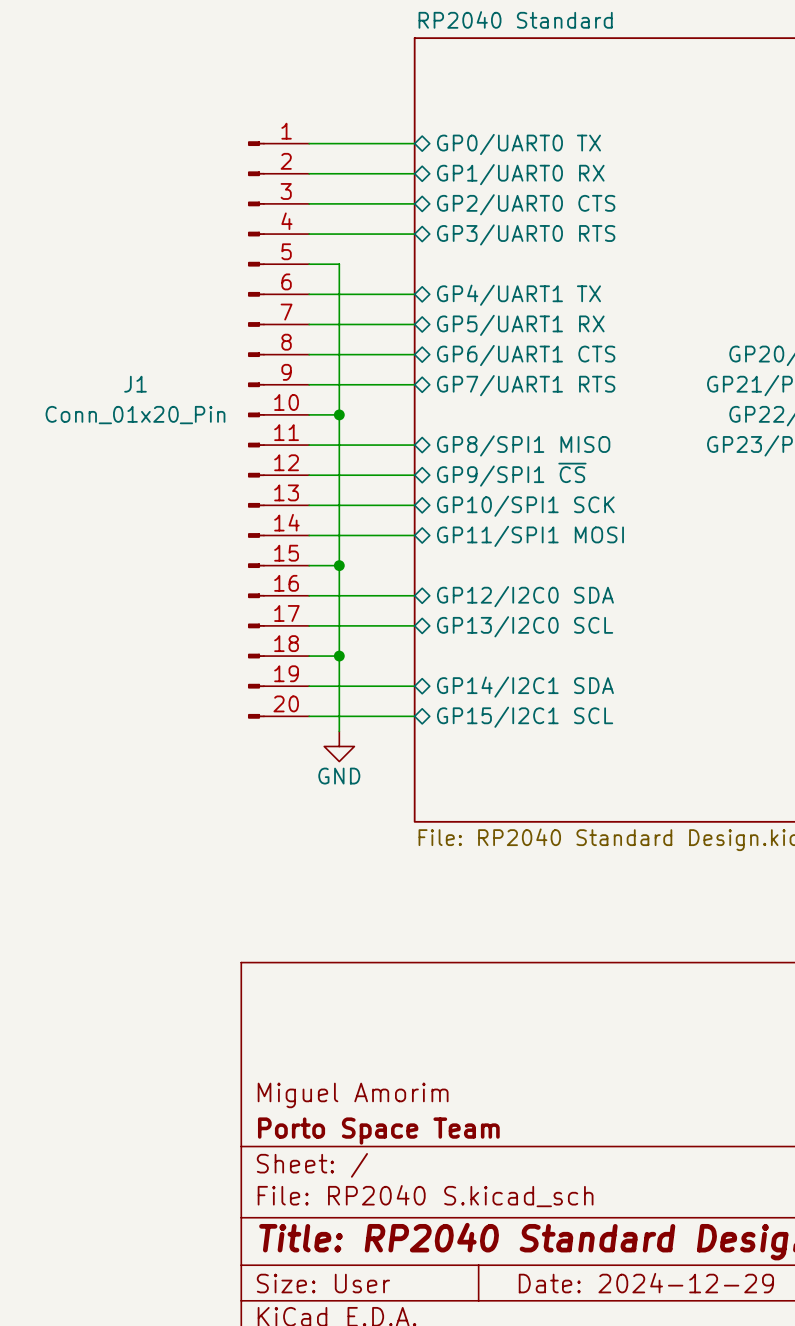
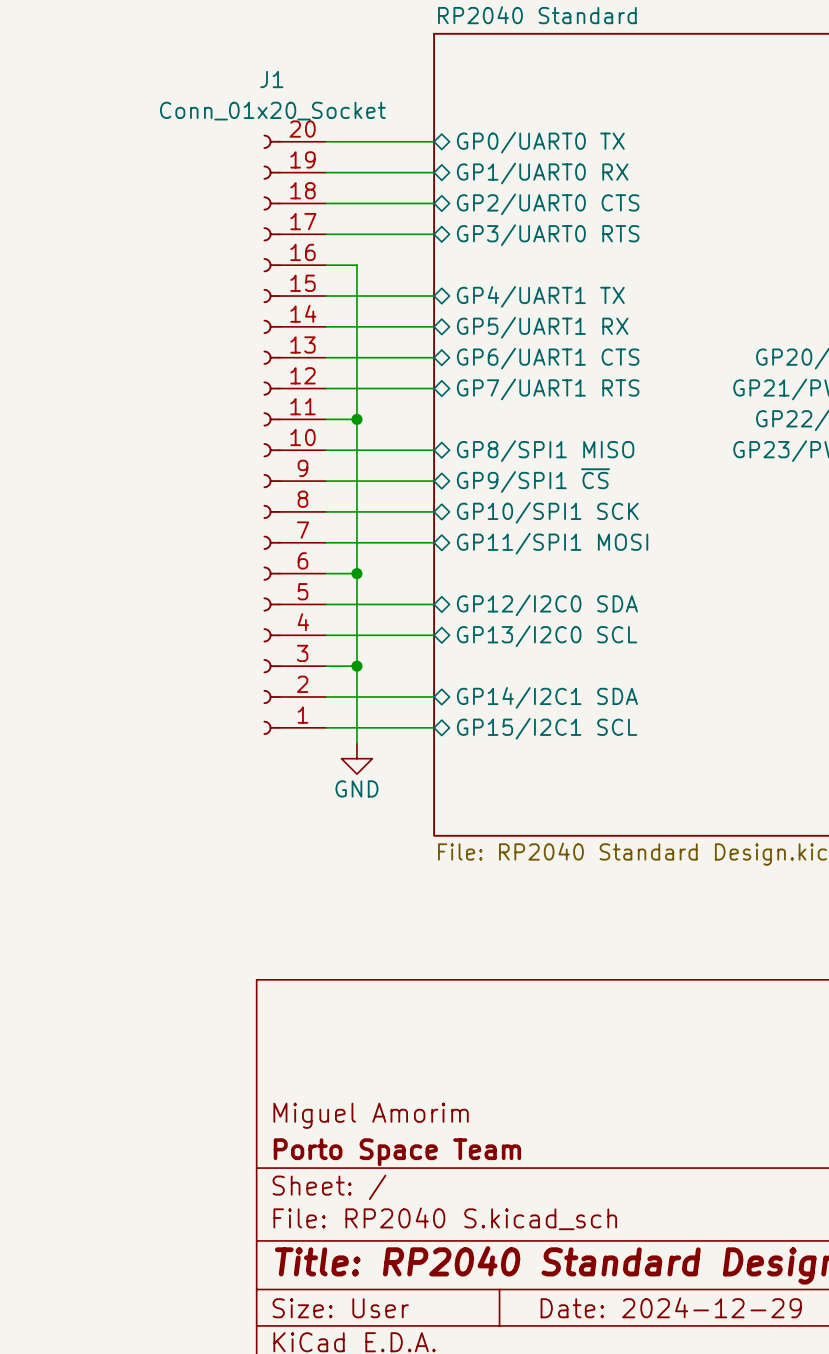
J1 symbol: [247, 141, 310, 719] -> [263, 134, 327, 735]
J1 name position: J1 (135, 384) -> J1 (271, 79)
J1 value: Conn_01x20_Pin (135, 415) -> Conn_01x20_Socket (272, 111)

